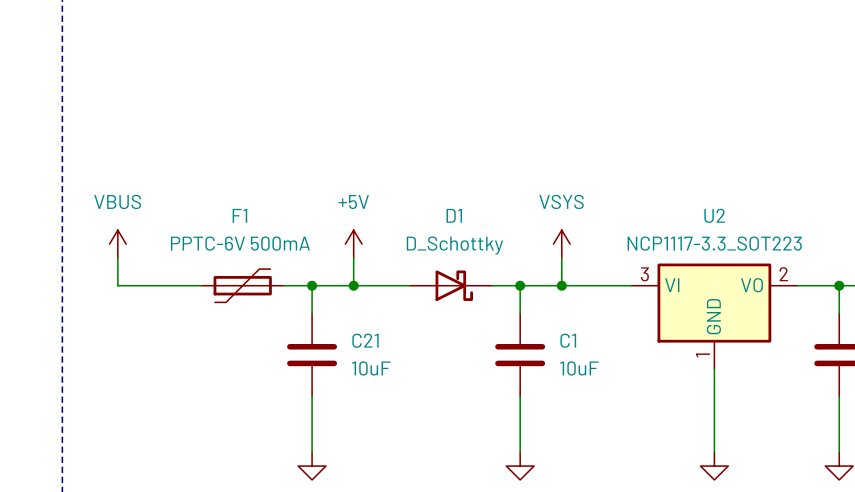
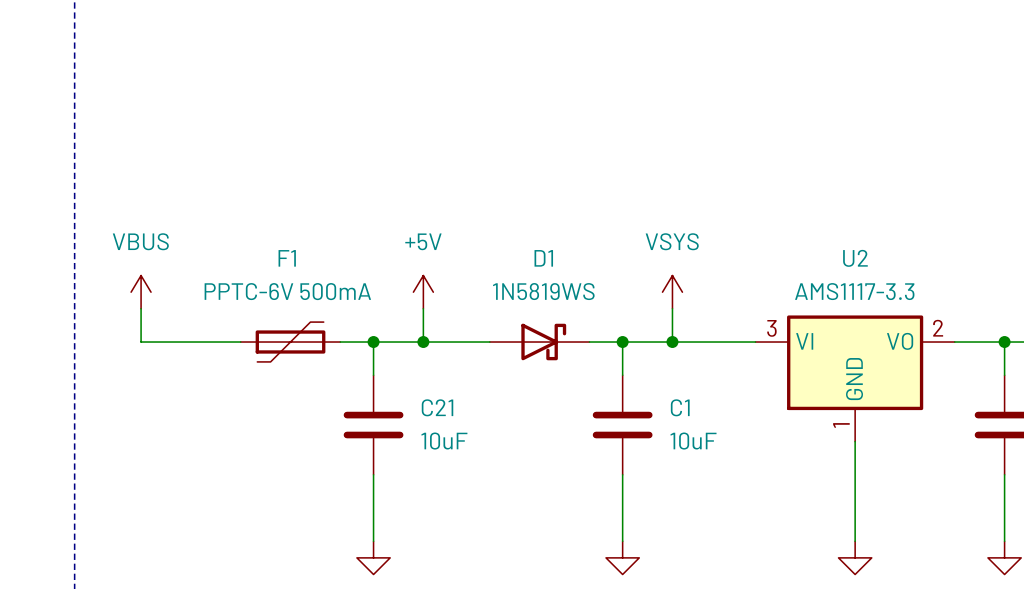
U2 value: NCP1117-3.3_SOT223 (714, 243) -> AMS1117-3.3 (854, 291)
D1 value: D_Schottky (454, 245) -> 1N5819WS (543, 291)
D1 flip: as is (454, 285) -> up-down (543, 342)

